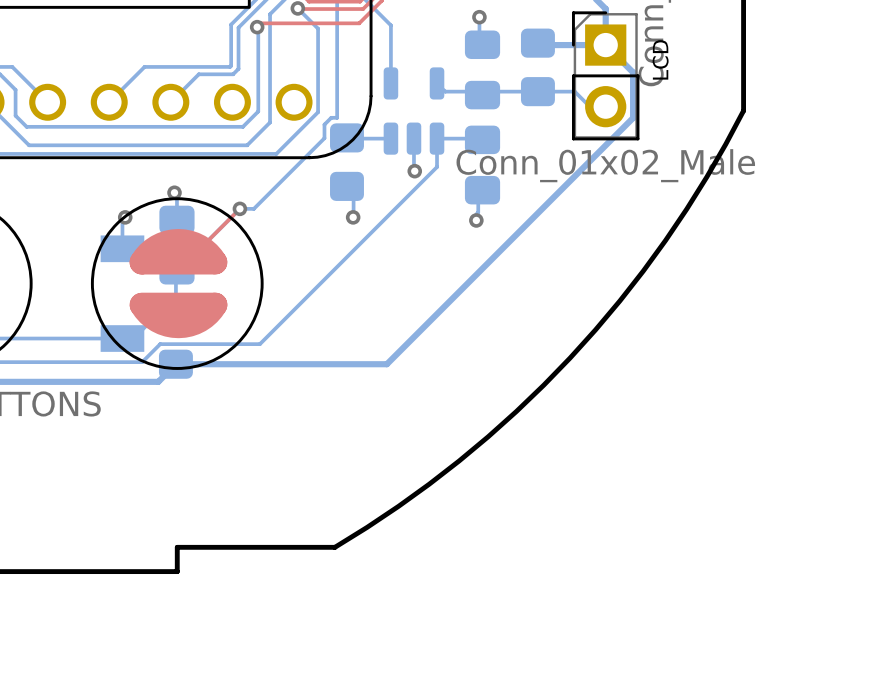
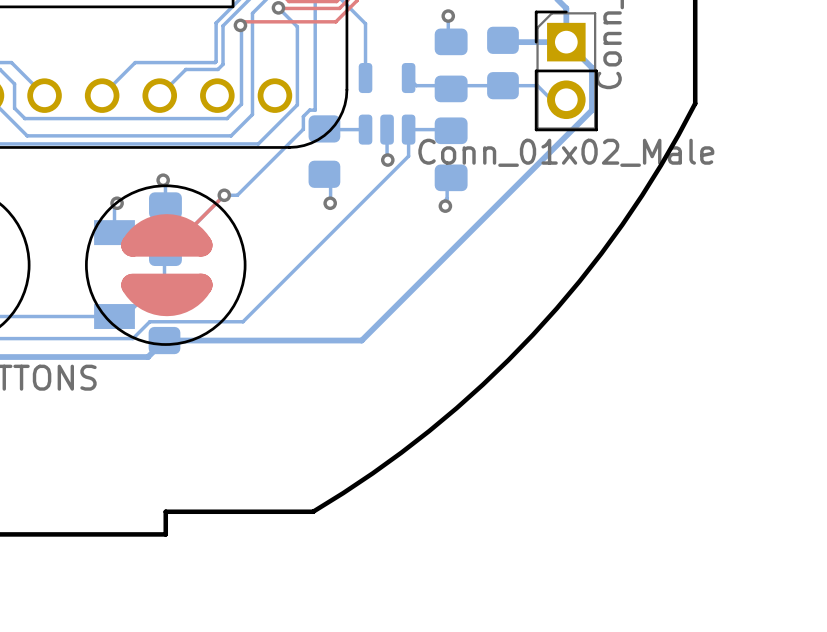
text: LCD (660, 59) -> none

